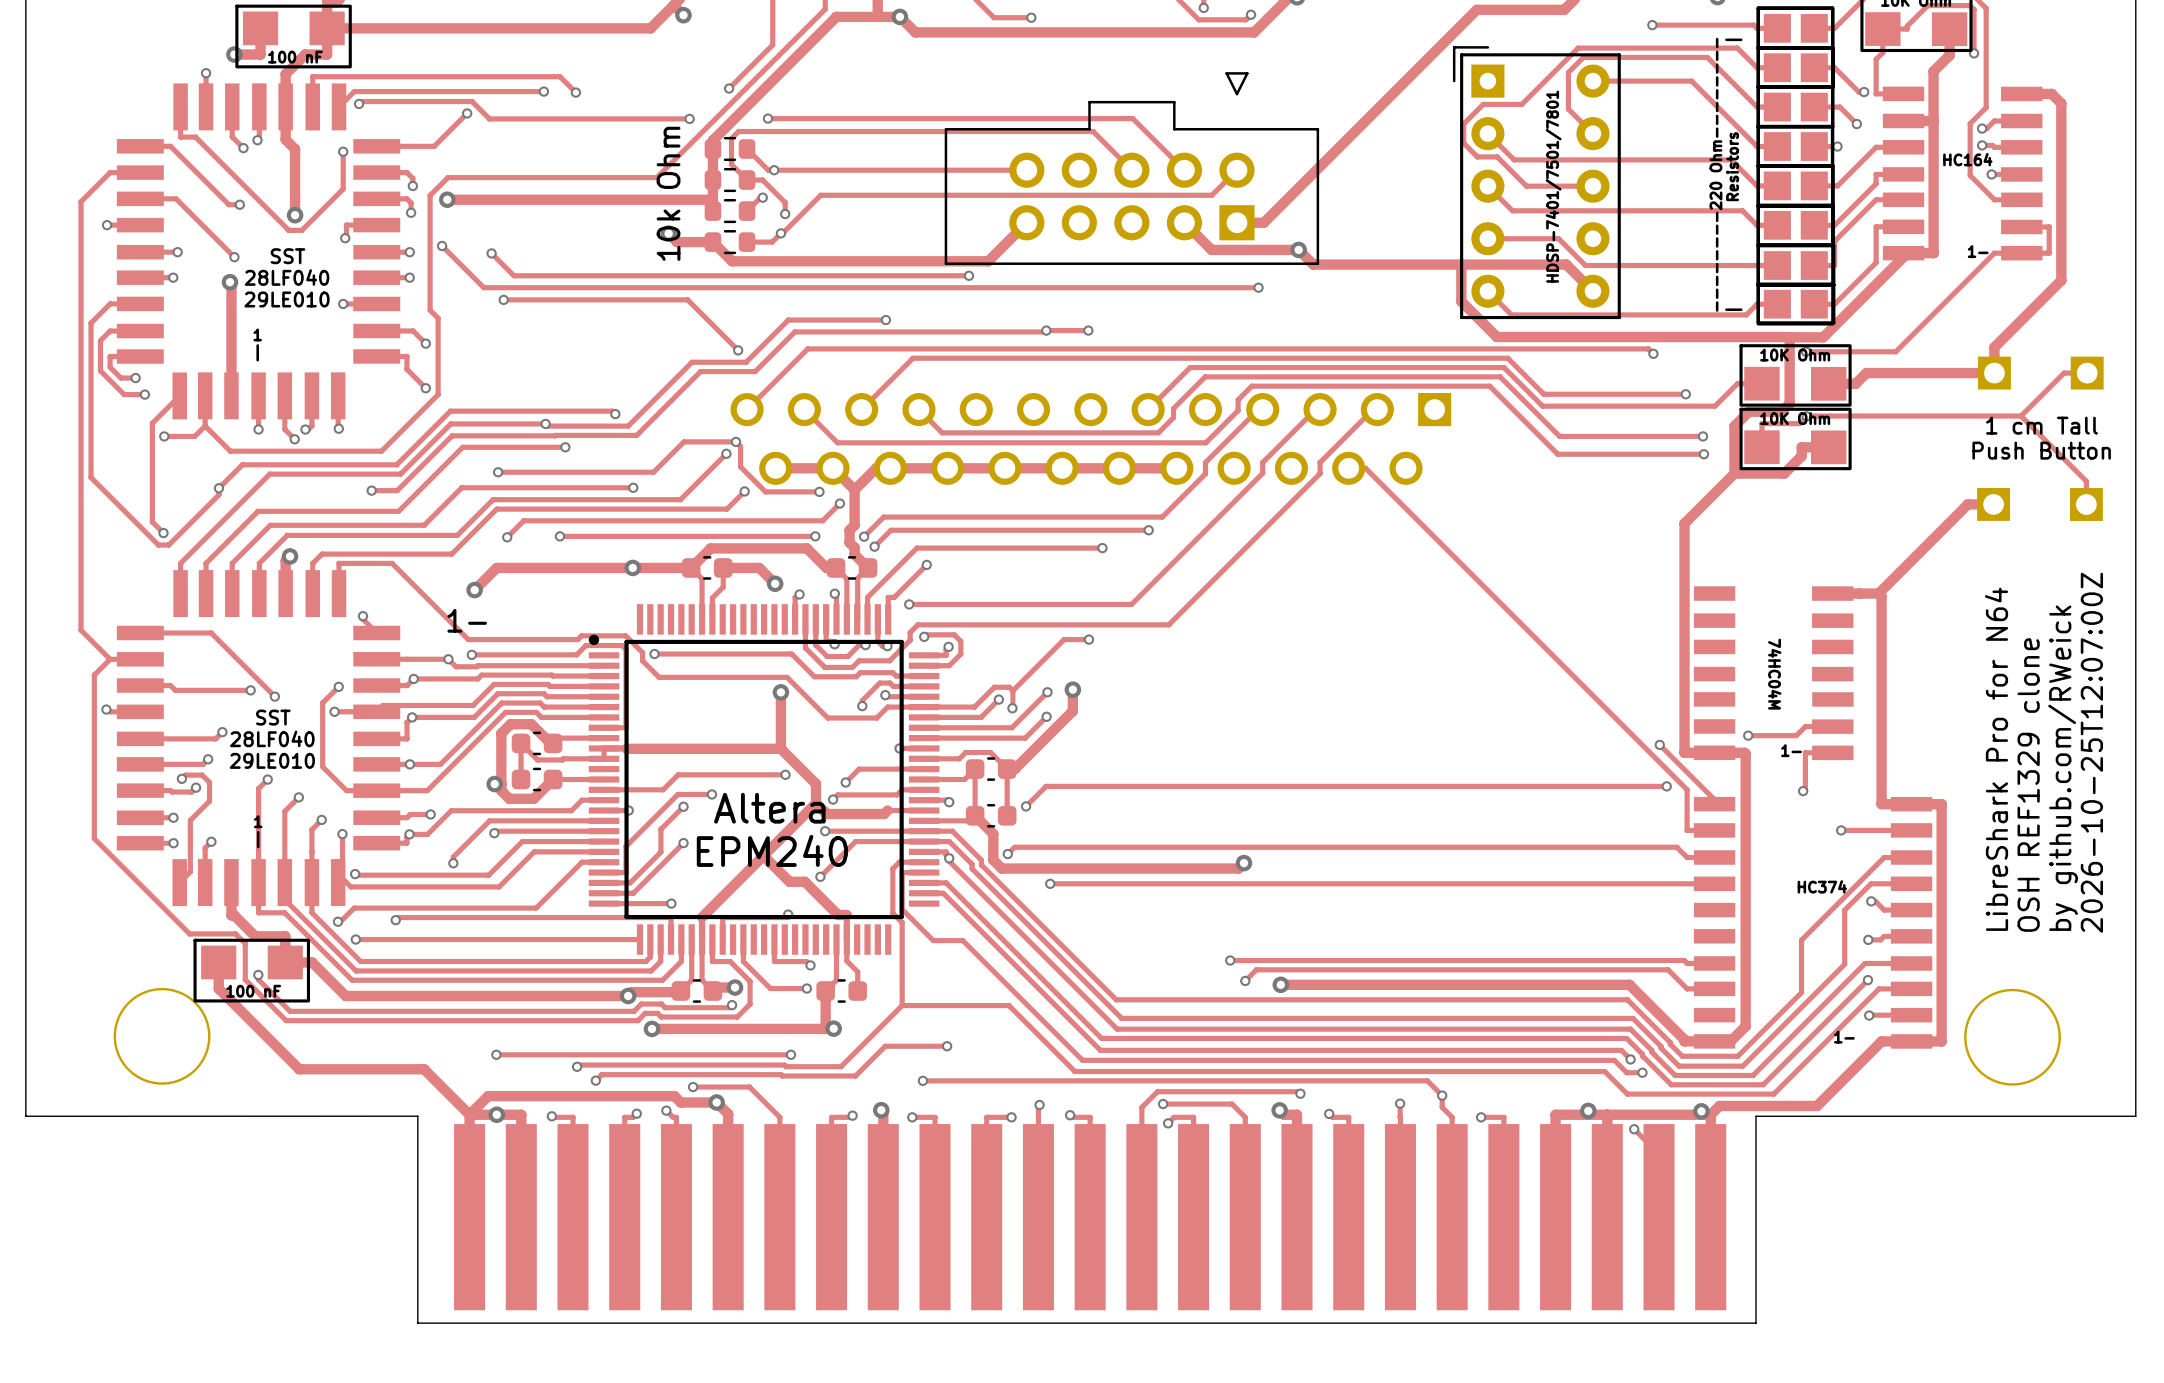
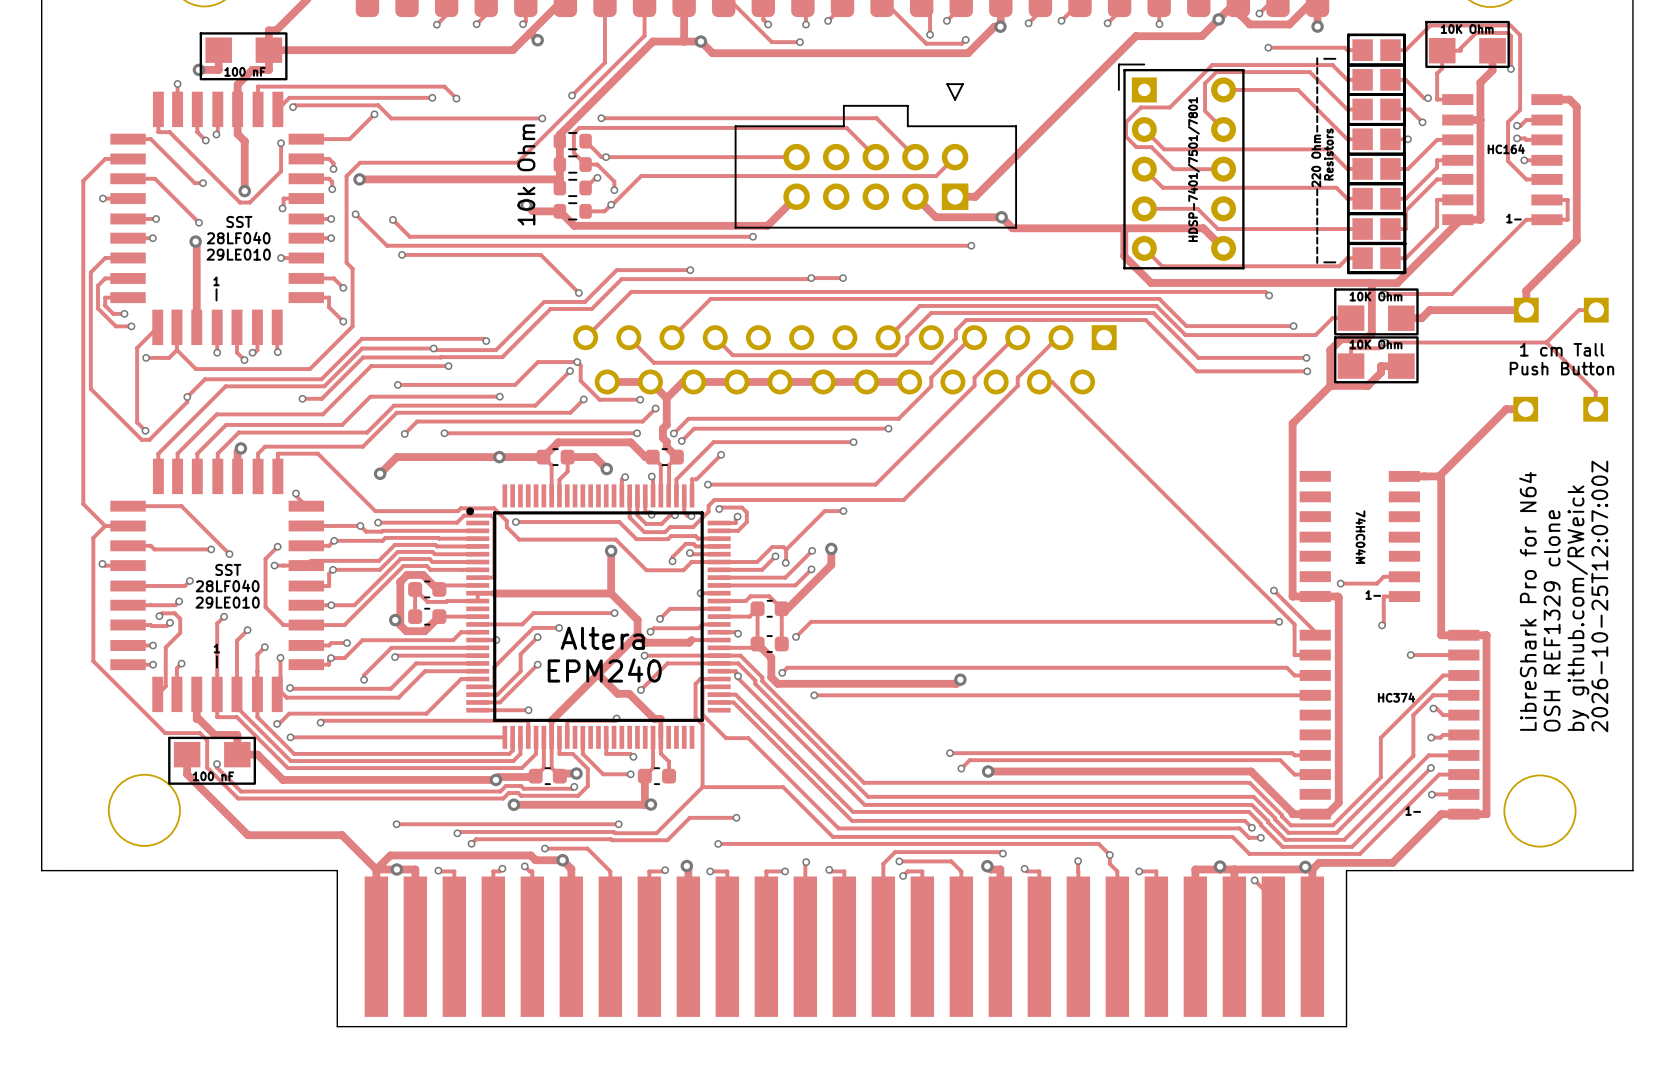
text: 1- (467, 620) -> none

